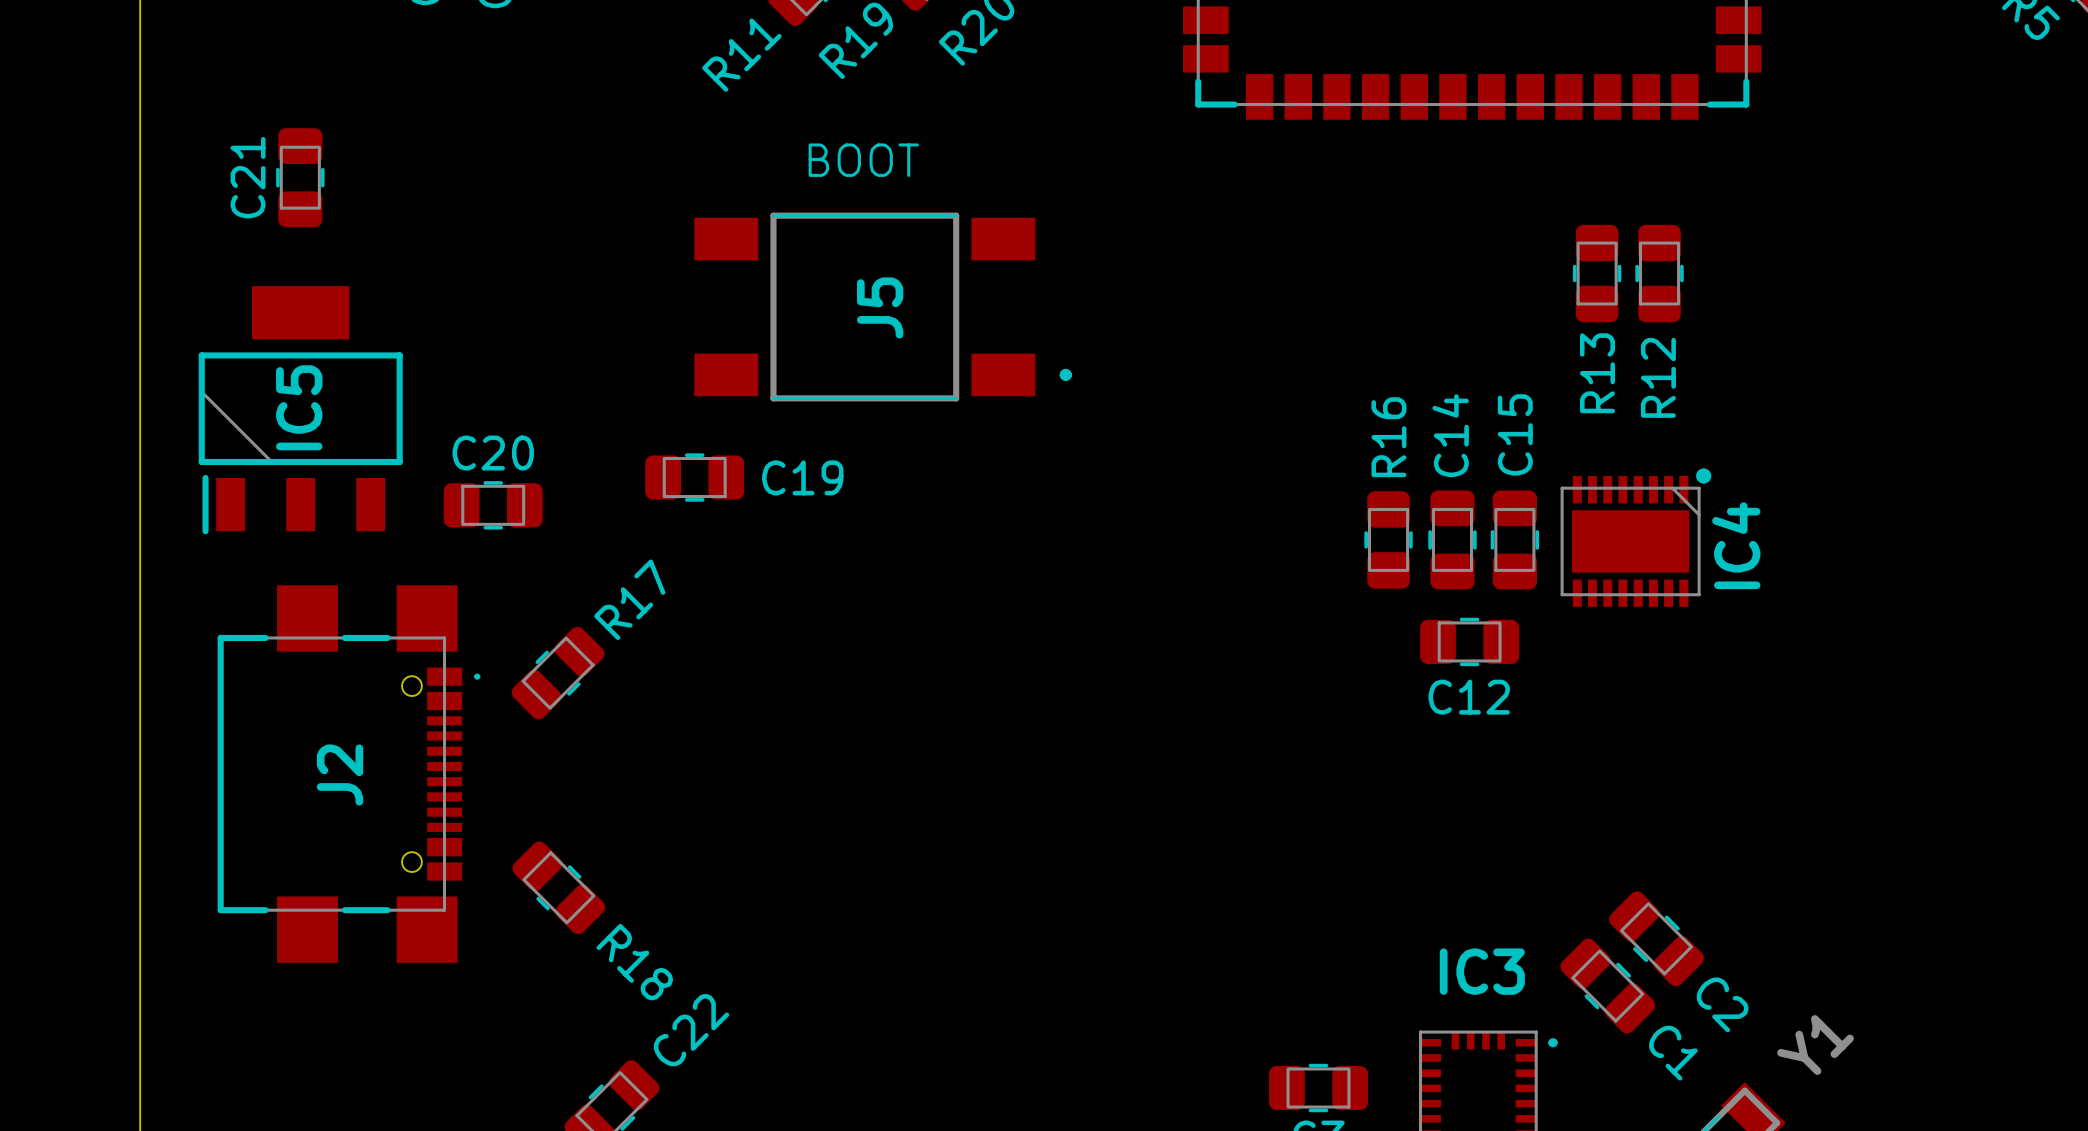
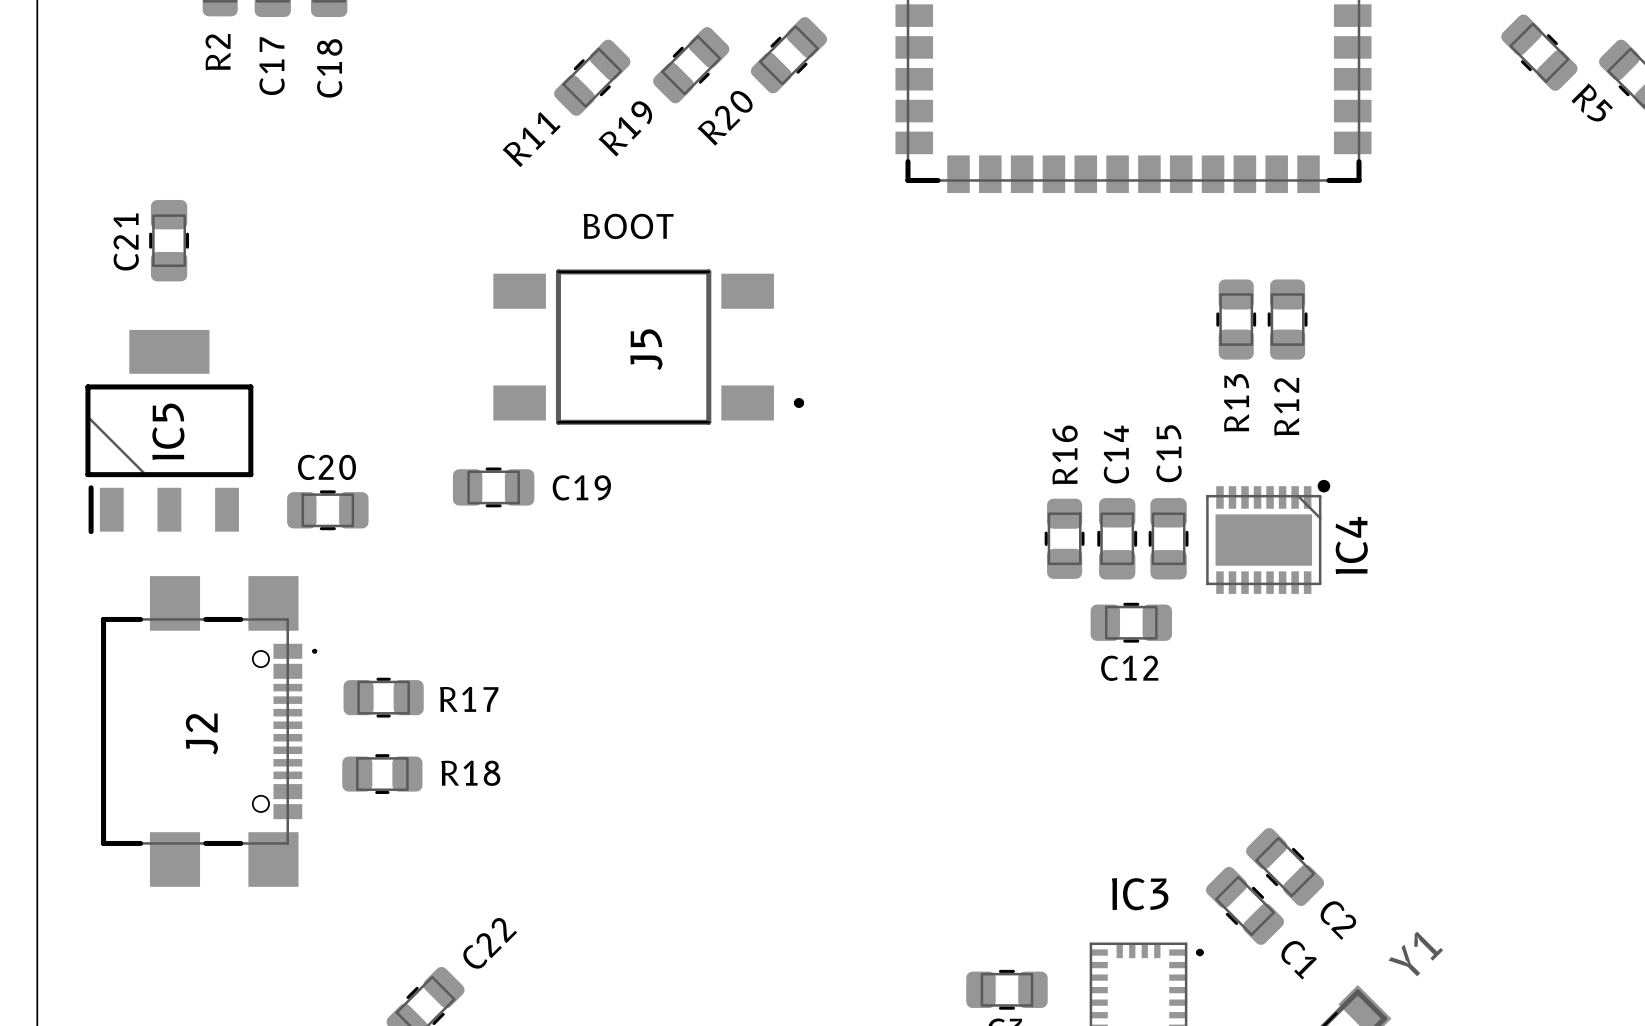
R17 rotation: 0° (558, 673) -> 45° clockwise (383, 697)
R17 position: (558, 673) -> (383, 697)
R18 rotation: 0° (558, 887) -> 45° counterclockwise (382, 774)
R18 position: (558, 887) -> (382, 774)

